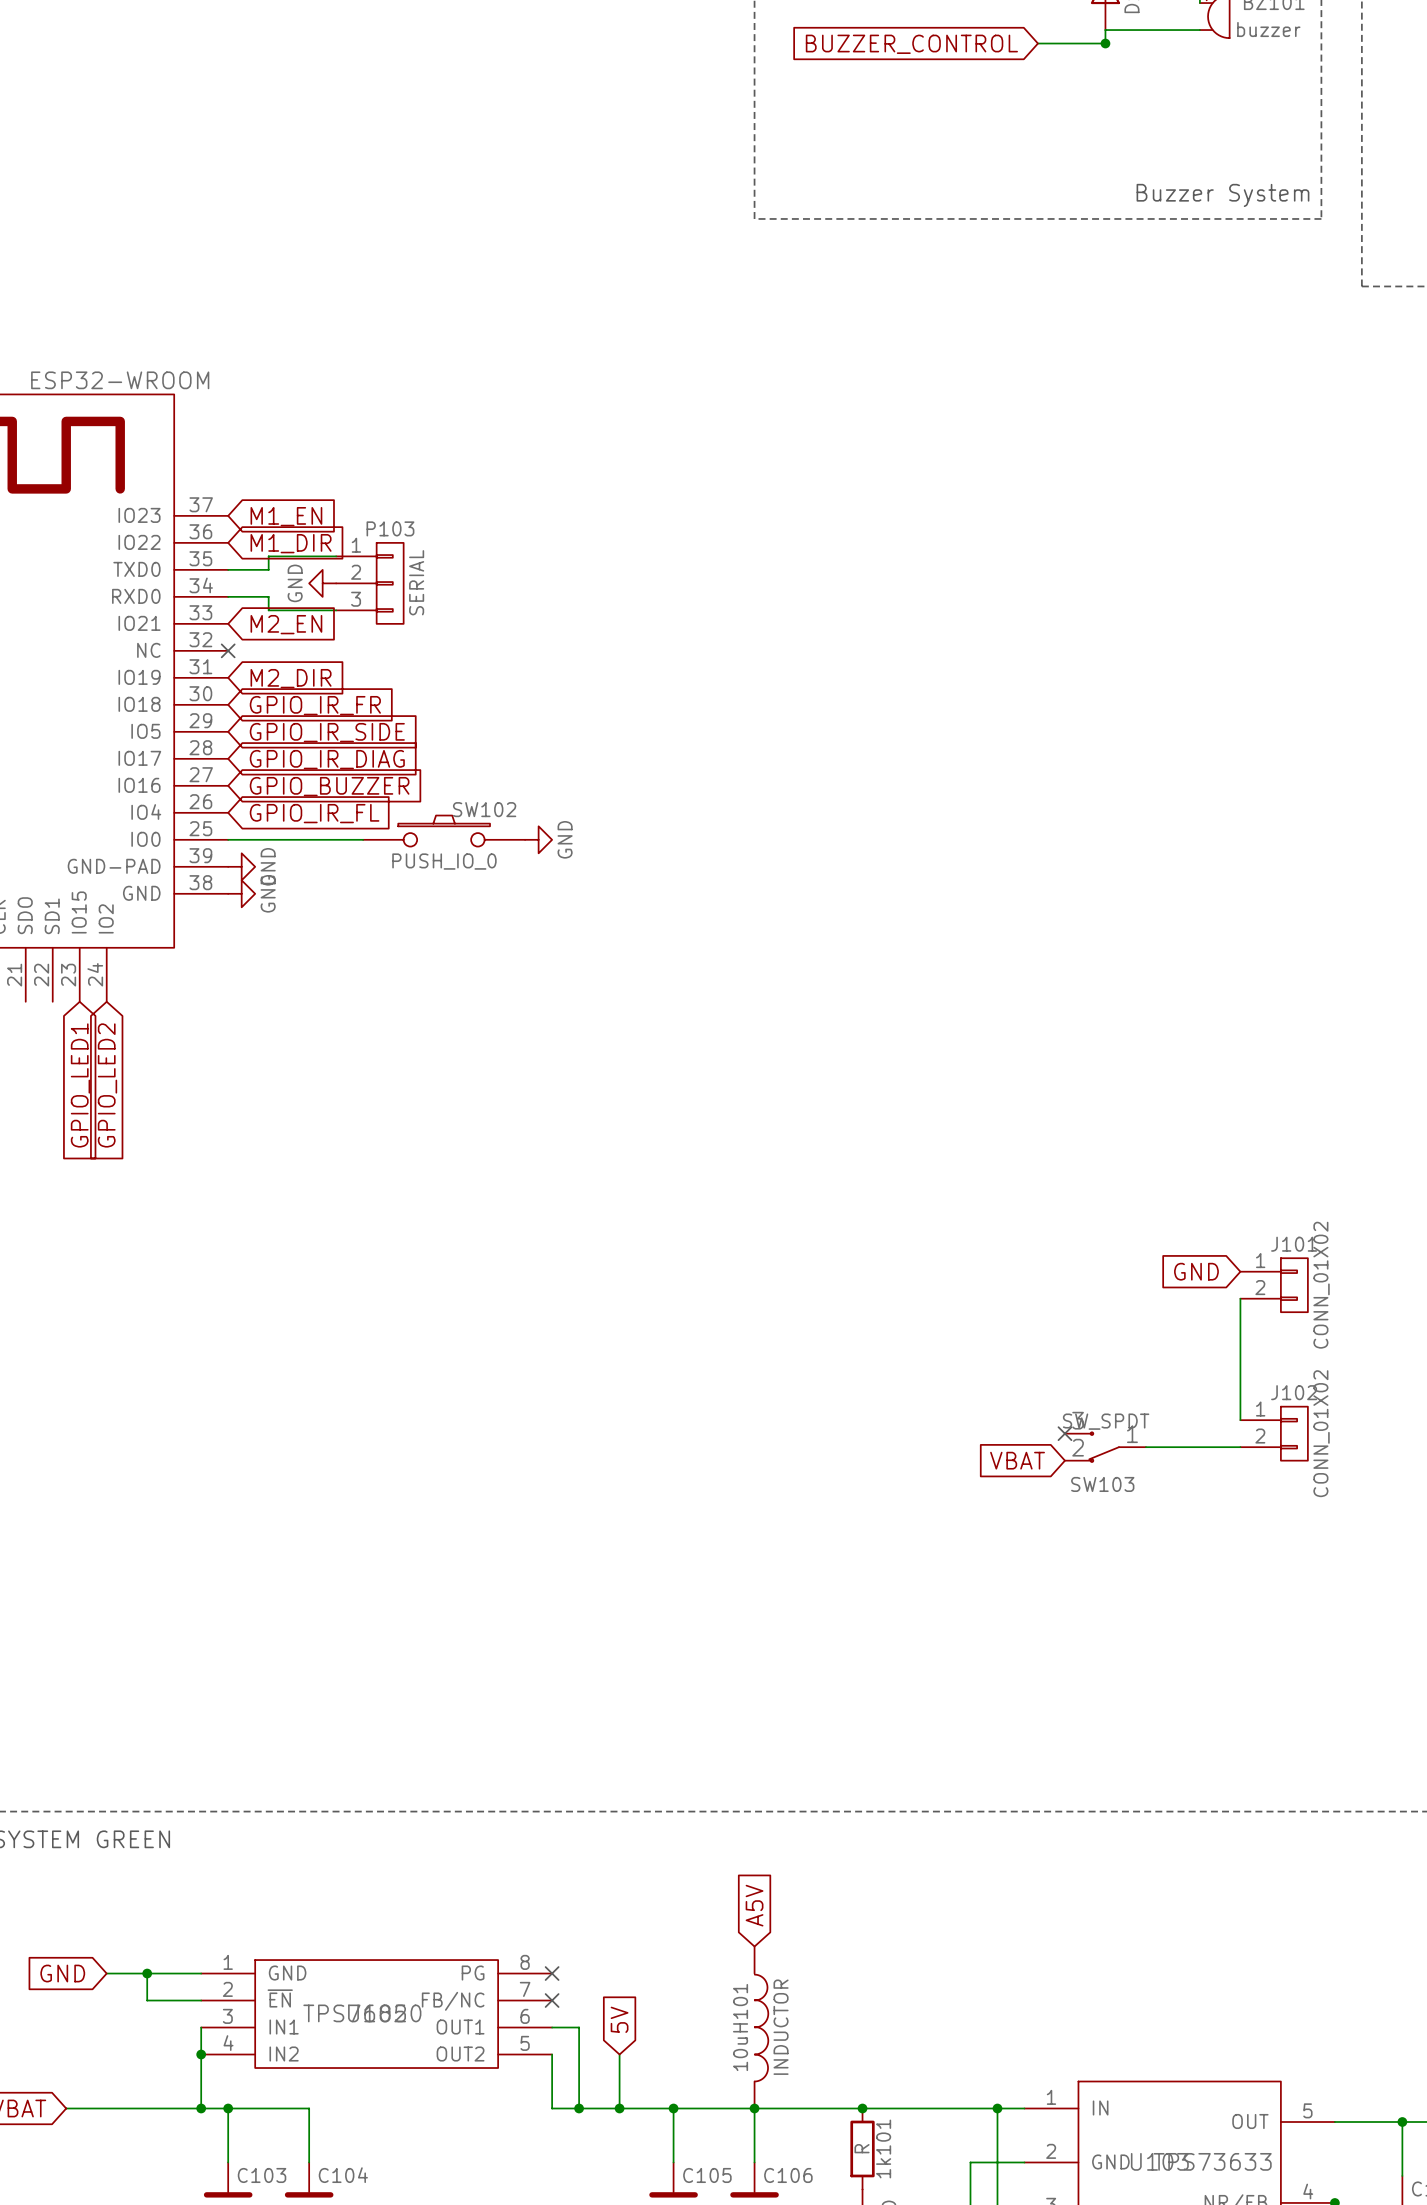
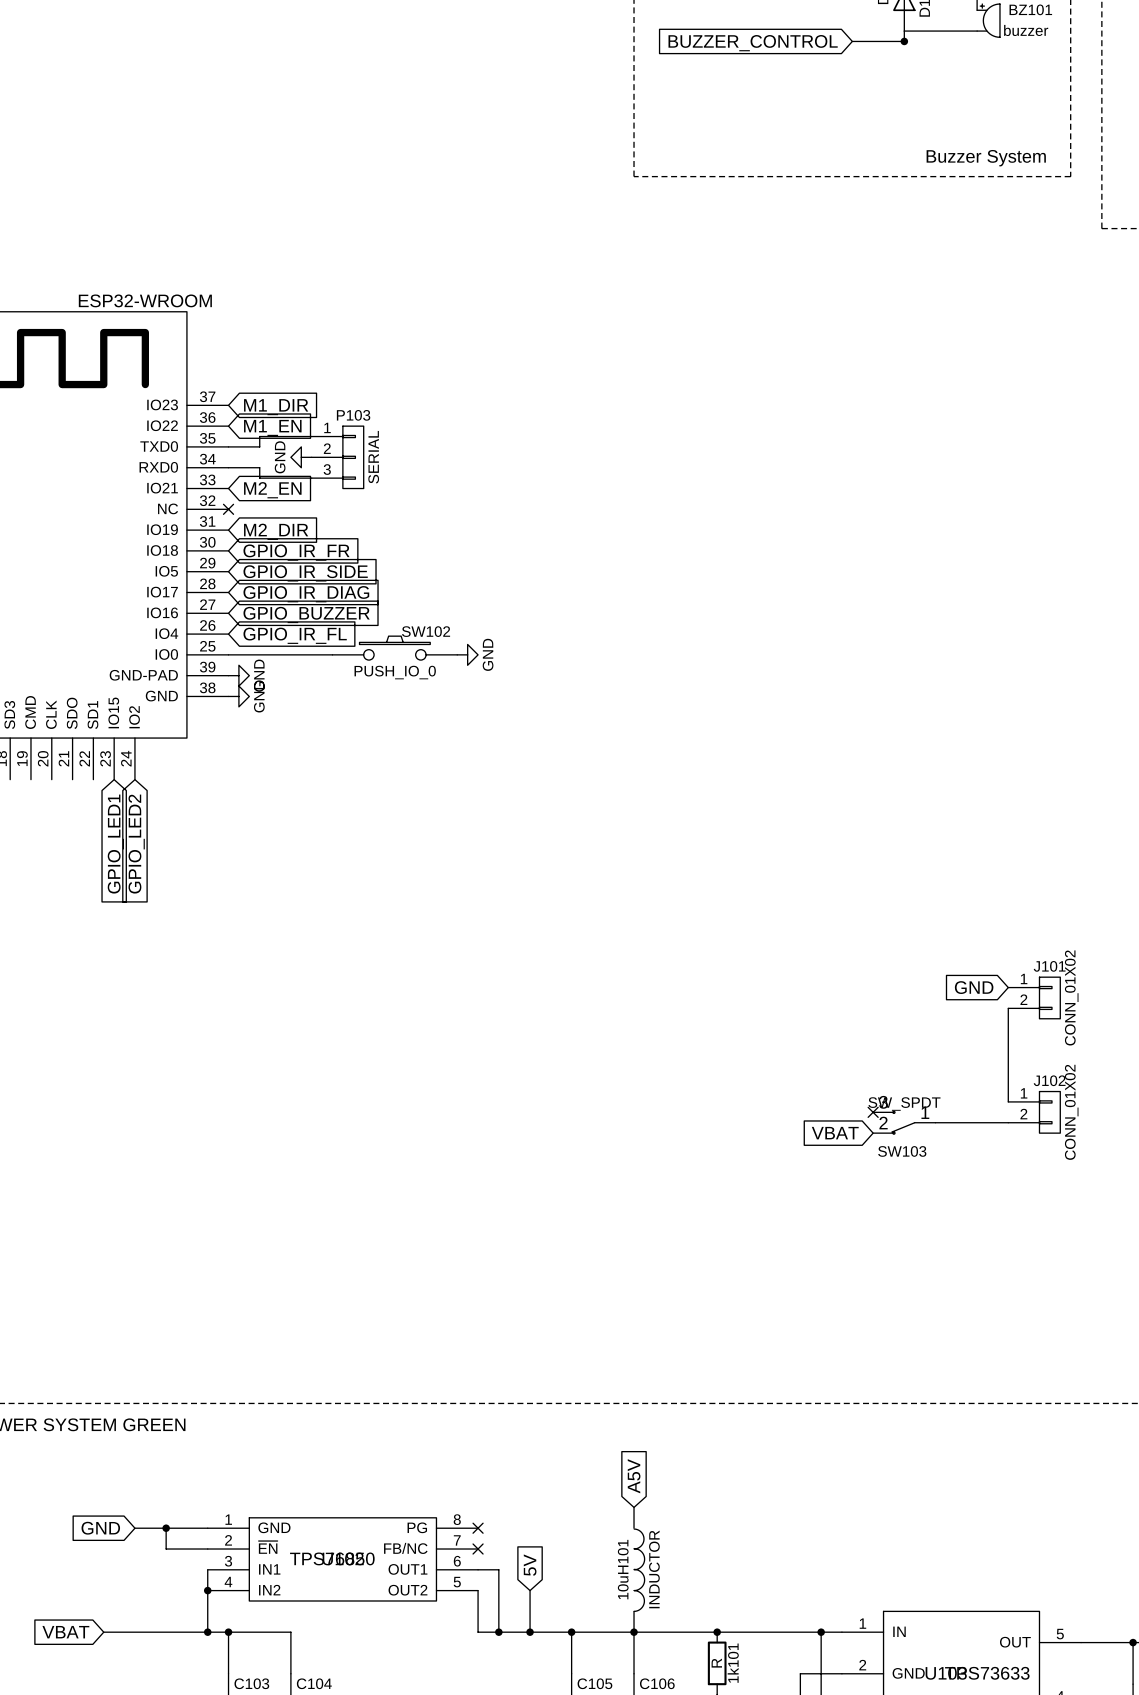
global label: M1_EN (286, 516) -> M1_DIR (276, 407)
global label: M1_DIR (291, 543) -> M1_EN (272, 427)

